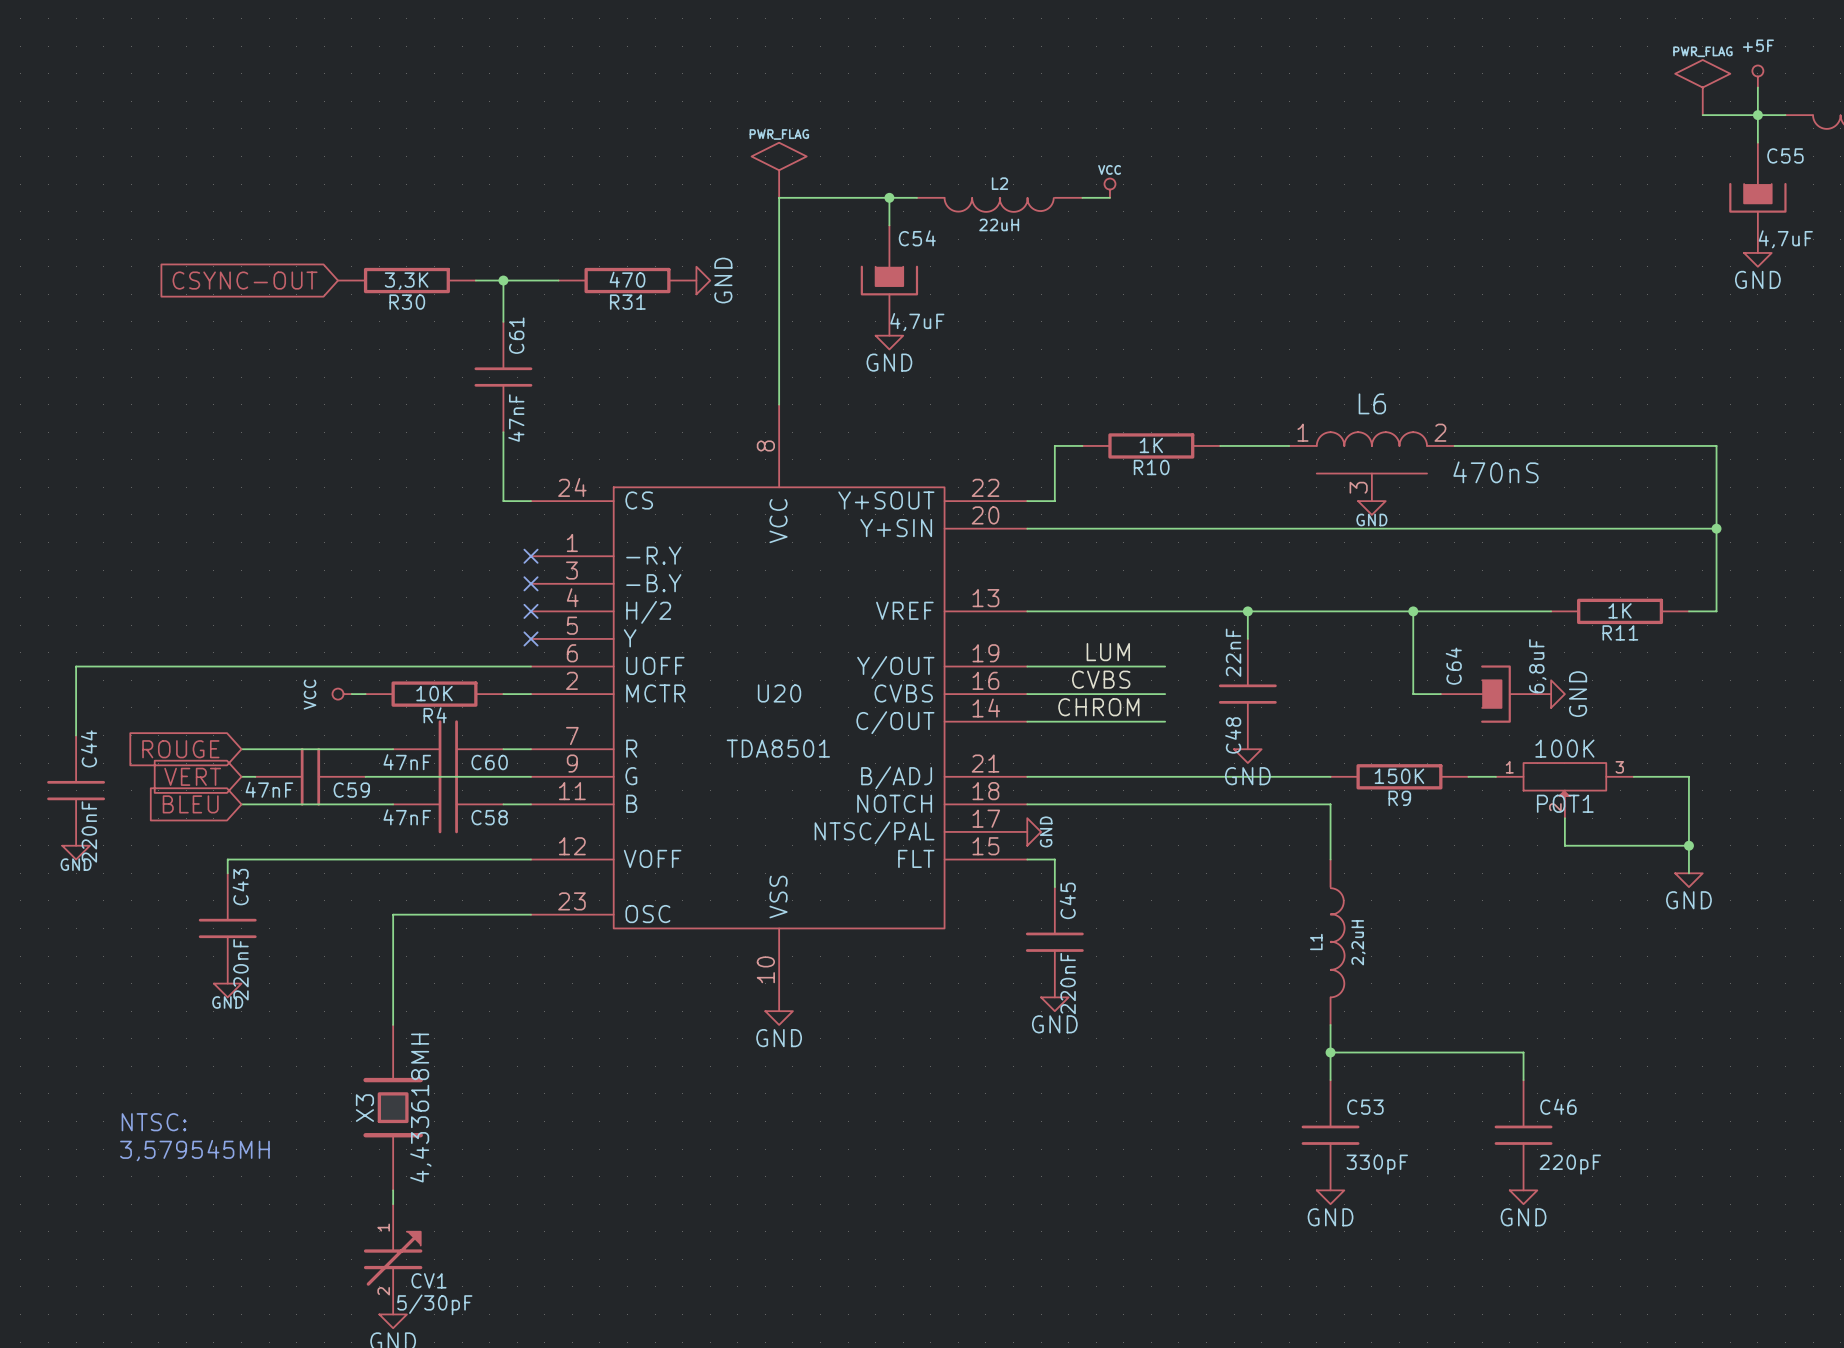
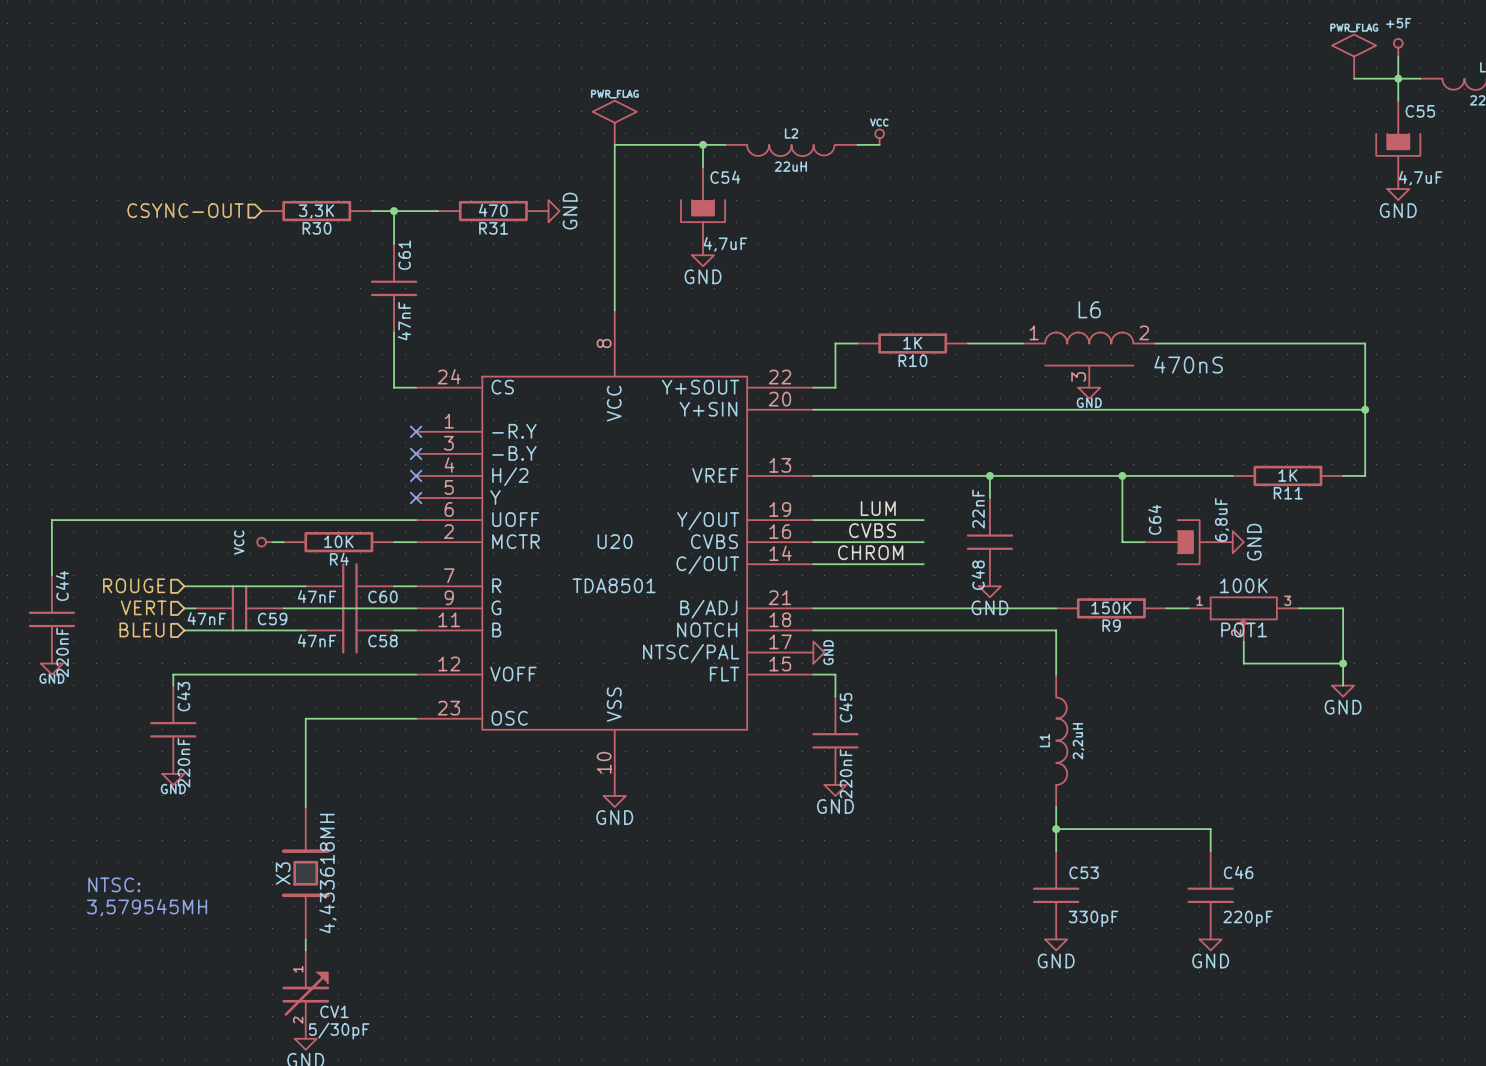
hierarchical label: none -> CSYNC-OUT (185, 210)
global label: CSYNC-OUT (245, 280) -> none
hierarchical label: none -> ROUGE (134, 585)
global label: ROUGE (180, 749) -> none
hierarchical label: none -> VERT (143, 607)
global label: VERT (192, 776) -> none
hierarchical label: none -> BLEU (142, 629)
global label: BLEU (190, 804) -> none

